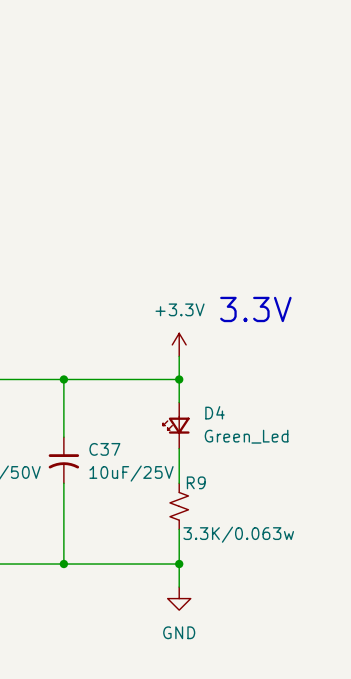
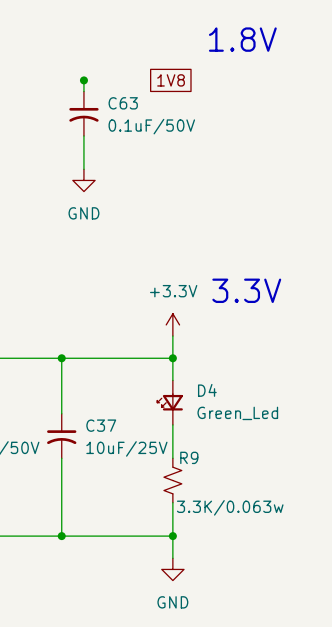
text: none -> 1.8V (242, 39)
wire: none -> (83, 80) (83, 91)
junction: none -> (83, 80)
global label: none -> 1V8 (171, 80)
C63: none -> 0.1uF/50V (83, 113)
wire: none -> (83, 135) (83, 169)
power symbol: none -> GND (83, 180)

